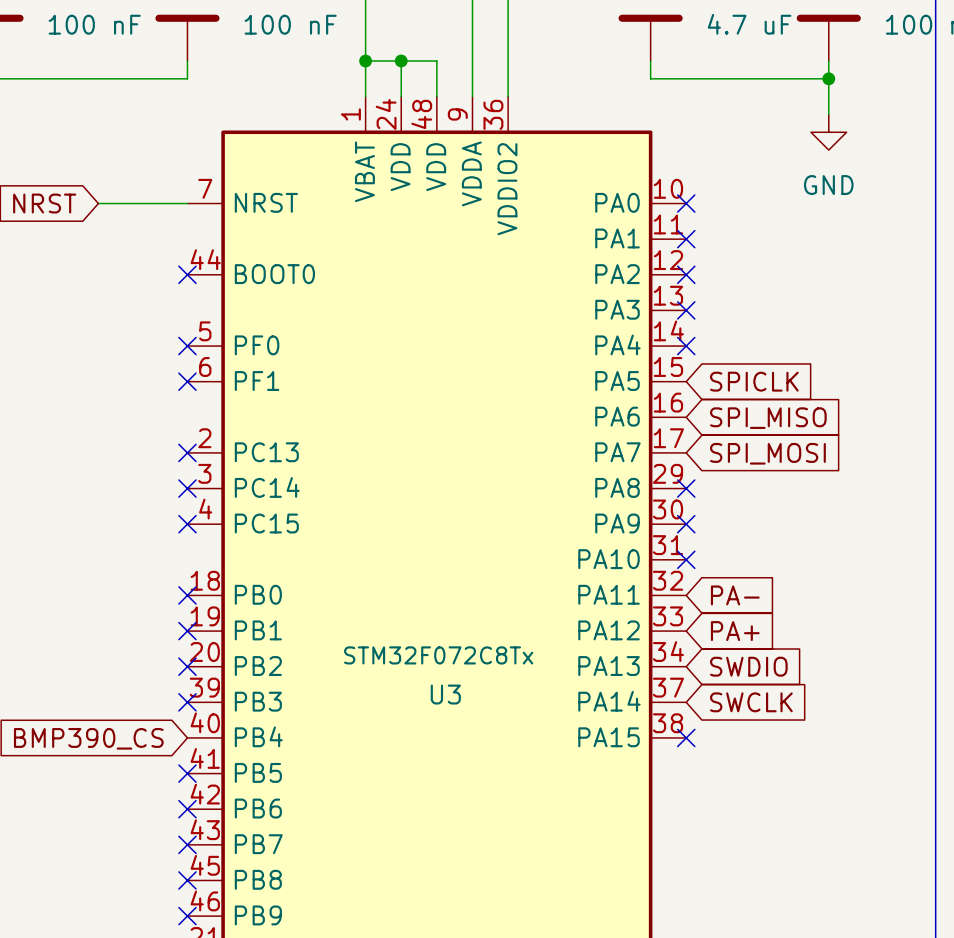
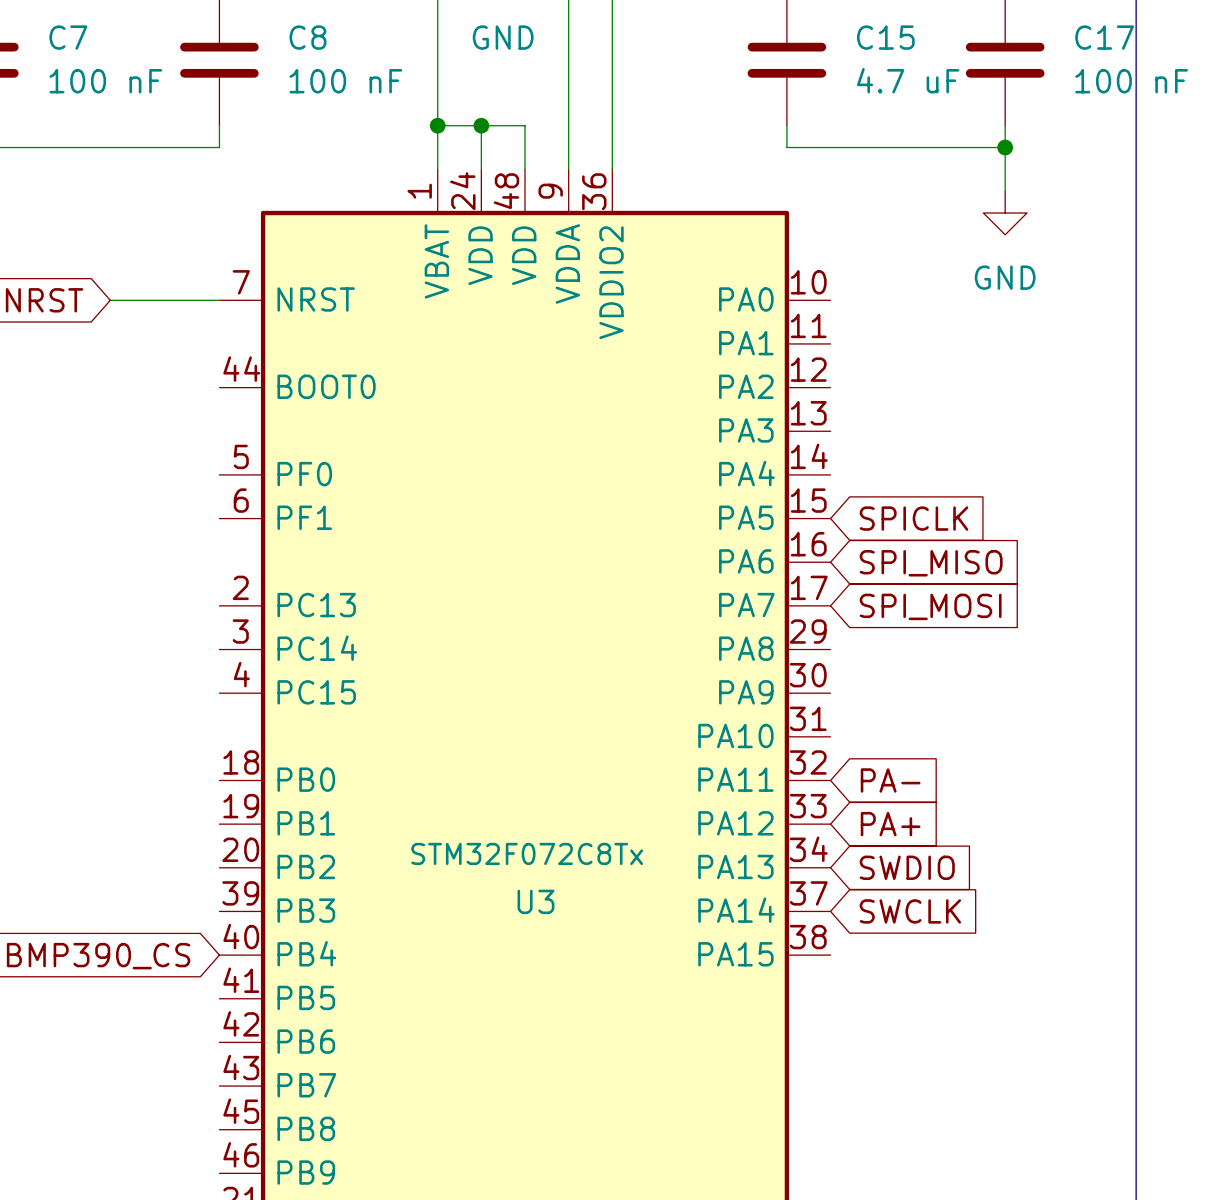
no-connect mark: (686, 203) -> none
no-connect mark: (686, 239) -> none
no-connect mark: (187, 274) -> none
no-connect mark: (686, 274) -> none
no-connect mark: (686, 310) -> none
no-connect mark: (187, 346) -> none
no-connect mark: (686, 346) -> none
no-connect mark: (187, 381) -> none
no-connect mark: (187, 452) -> none
no-connect mark: (187, 488) -> none
no-connect mark: (686, 488) -> none
no-connect mark: (187, 524) -> none
no-connect mark: (686, 524) -> none
no-connect mark: (686, 559) -> none
no-connect mark: (187, 595) -> none
no-connect mark: (187, 631) -> none
no-connect mark: (187, 666) -> none
no-connect mark: (187, 702) -> none
no-connect mark: (686, 737) -> none
no-connect mark: (187, 773) -> none
no-connect mark: (187, 809) -> none
no-connect mark: (187, 844) -> none
no-connect mark: (187, 880) -> none
no-connect mark: (187, 916) -> none

